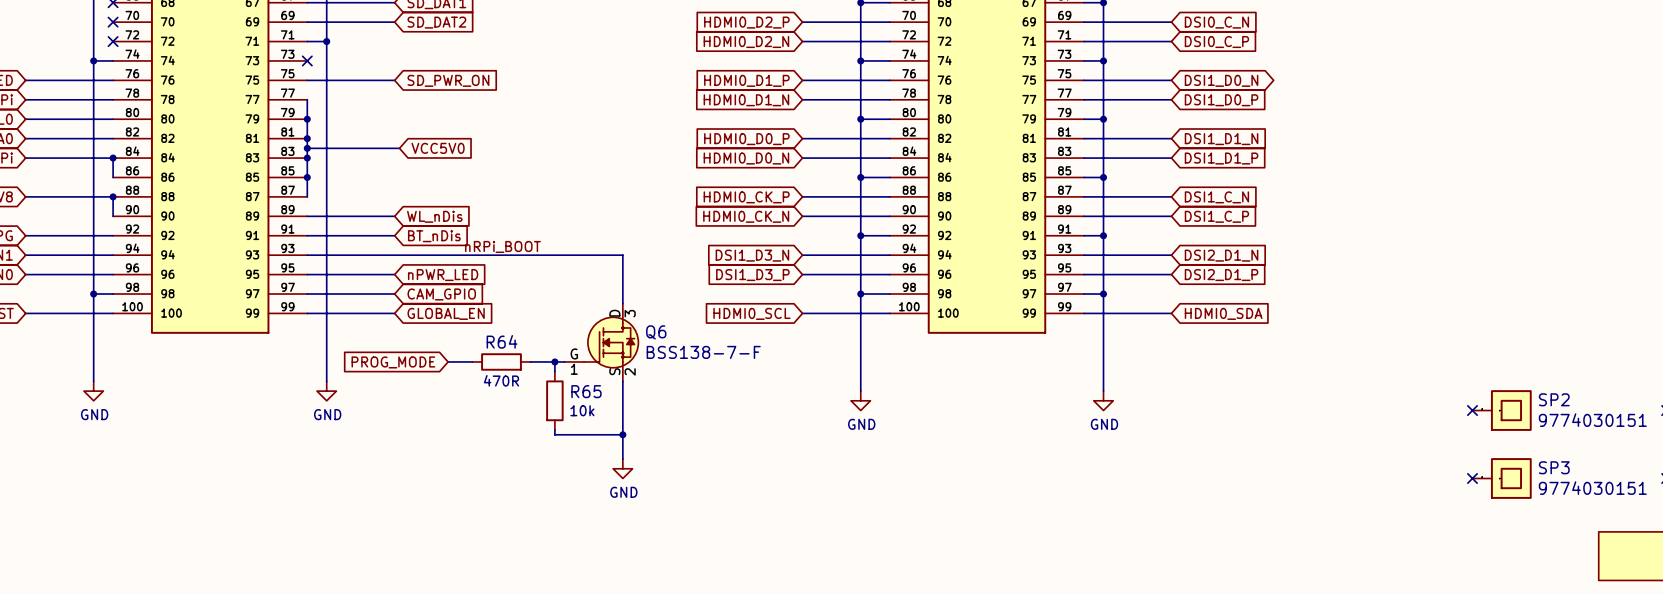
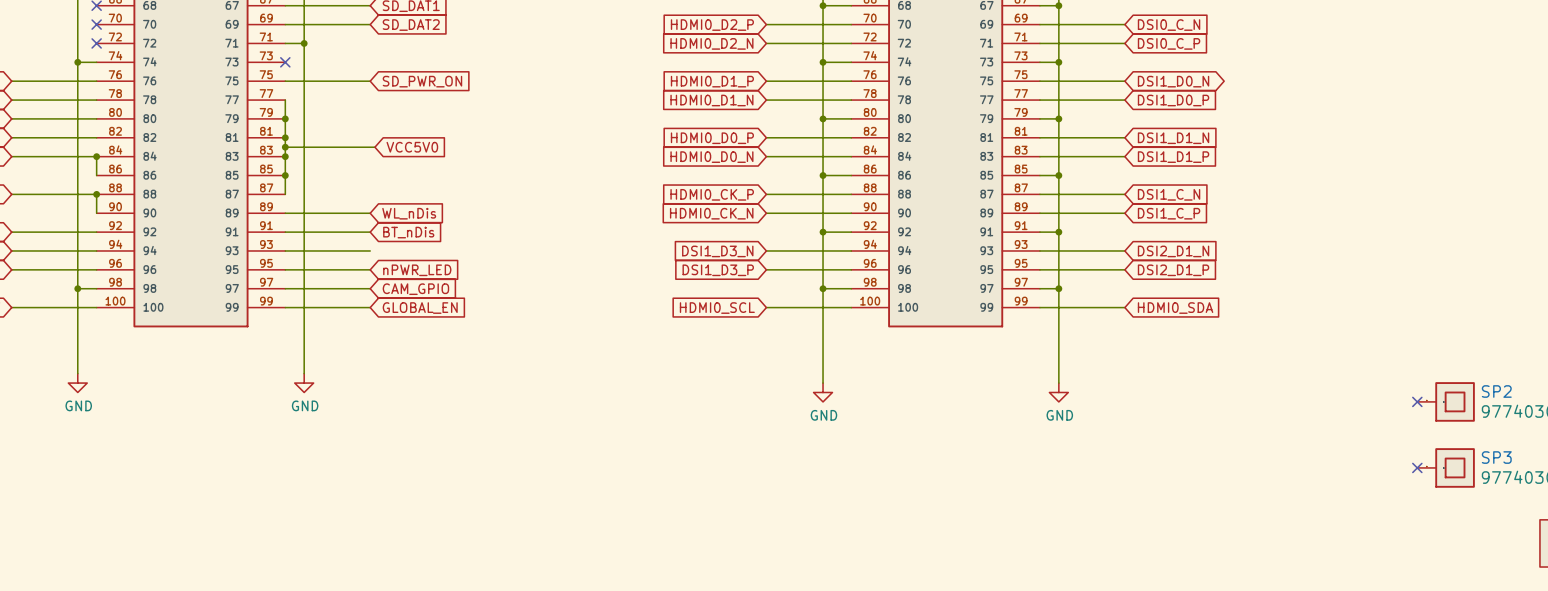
label: nRPi_BOOT (502, 246) -> none
wire: (394, 255) (622, 255) (622, 303) -> none
Q6: BSS138-7-F (601, 342) -> none
wire: (448, 361) (472, 361) -> none
R64: (501, 361) -> none
wire: (530, 361) (564, 361) -> none
wire: (554, 361) (554, 371) -> none
junction: (554, 361) -> none
global label: PROG_MODE (393, 362) -> none
wire: (622, 381) (622, 459) -> none
R65: (554, 400) -> none
wire: (554, 429) (554, 434) (622, 434) -> none
junction: (622, 434) -> none
power symbol: GND (622, 468) -> none

